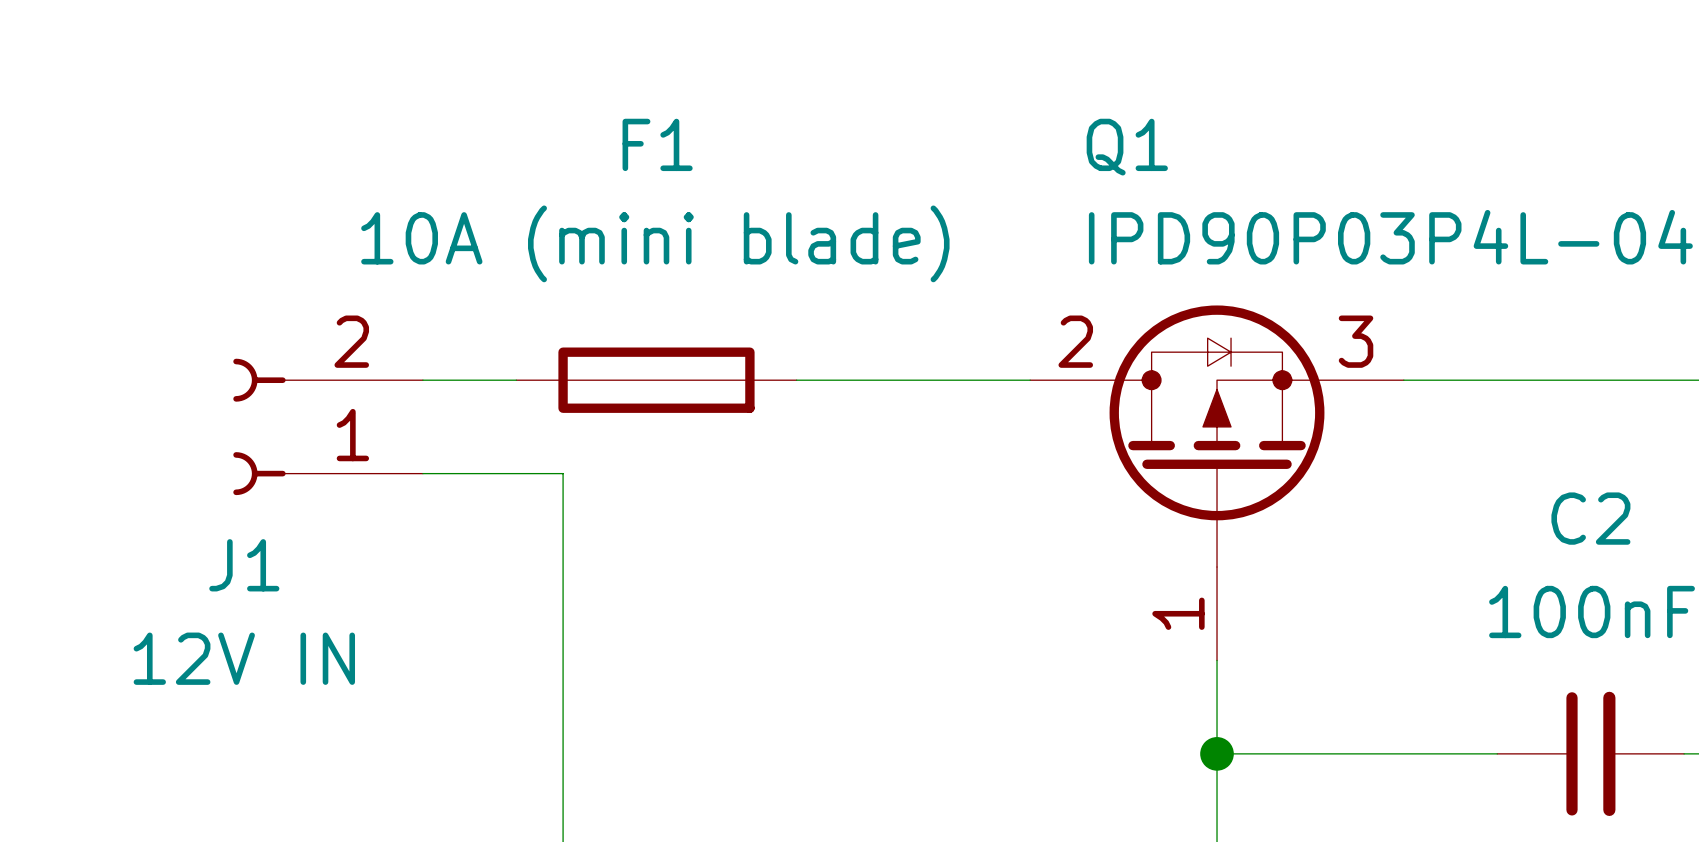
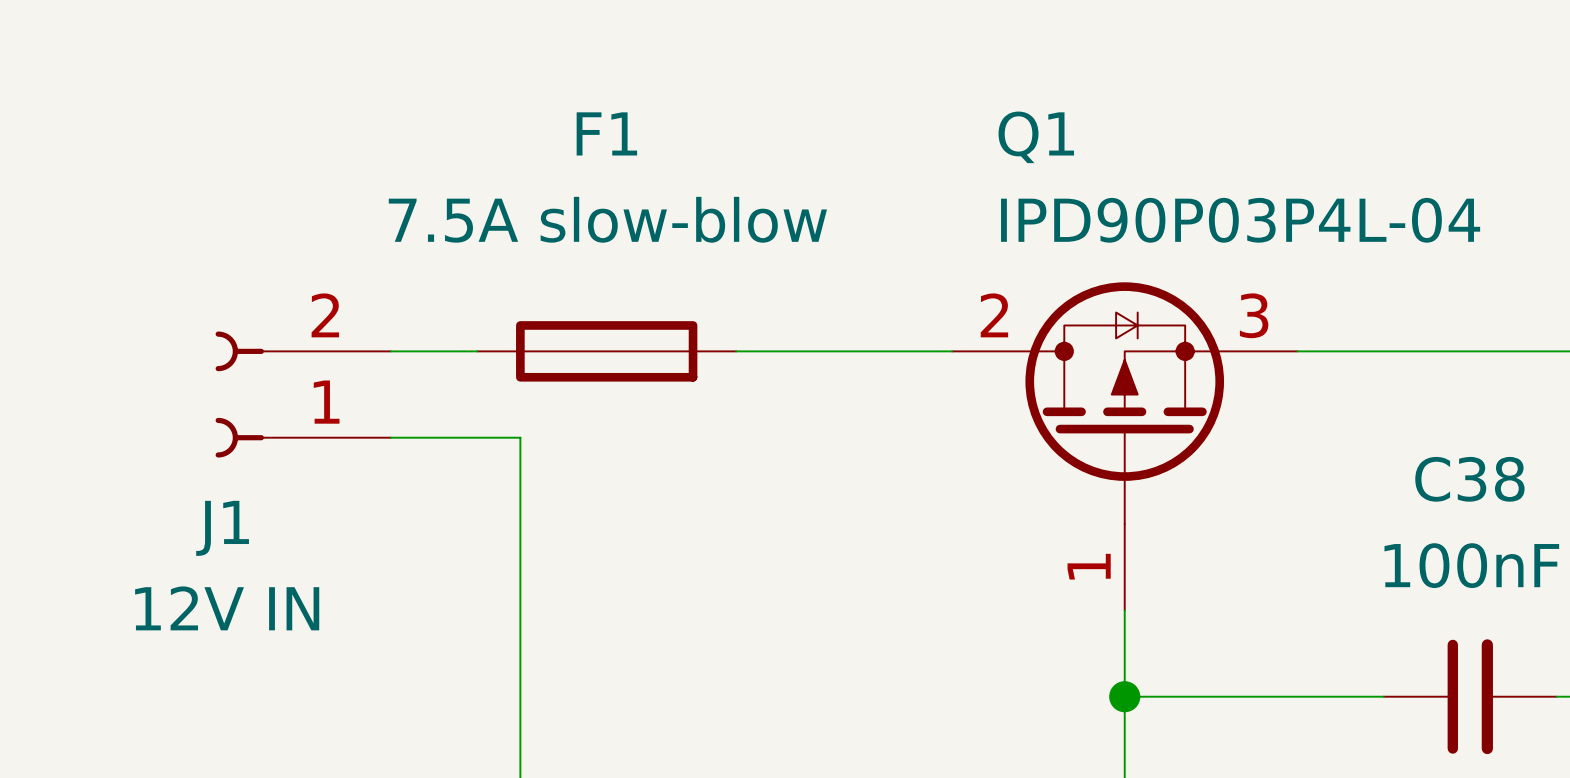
F1 value: 10A (mini blade) (655, 243) -> 7.5A slow-blow (607, 219)
C2 name: C2 (1590, 518) -> C38 (1469, 479)

